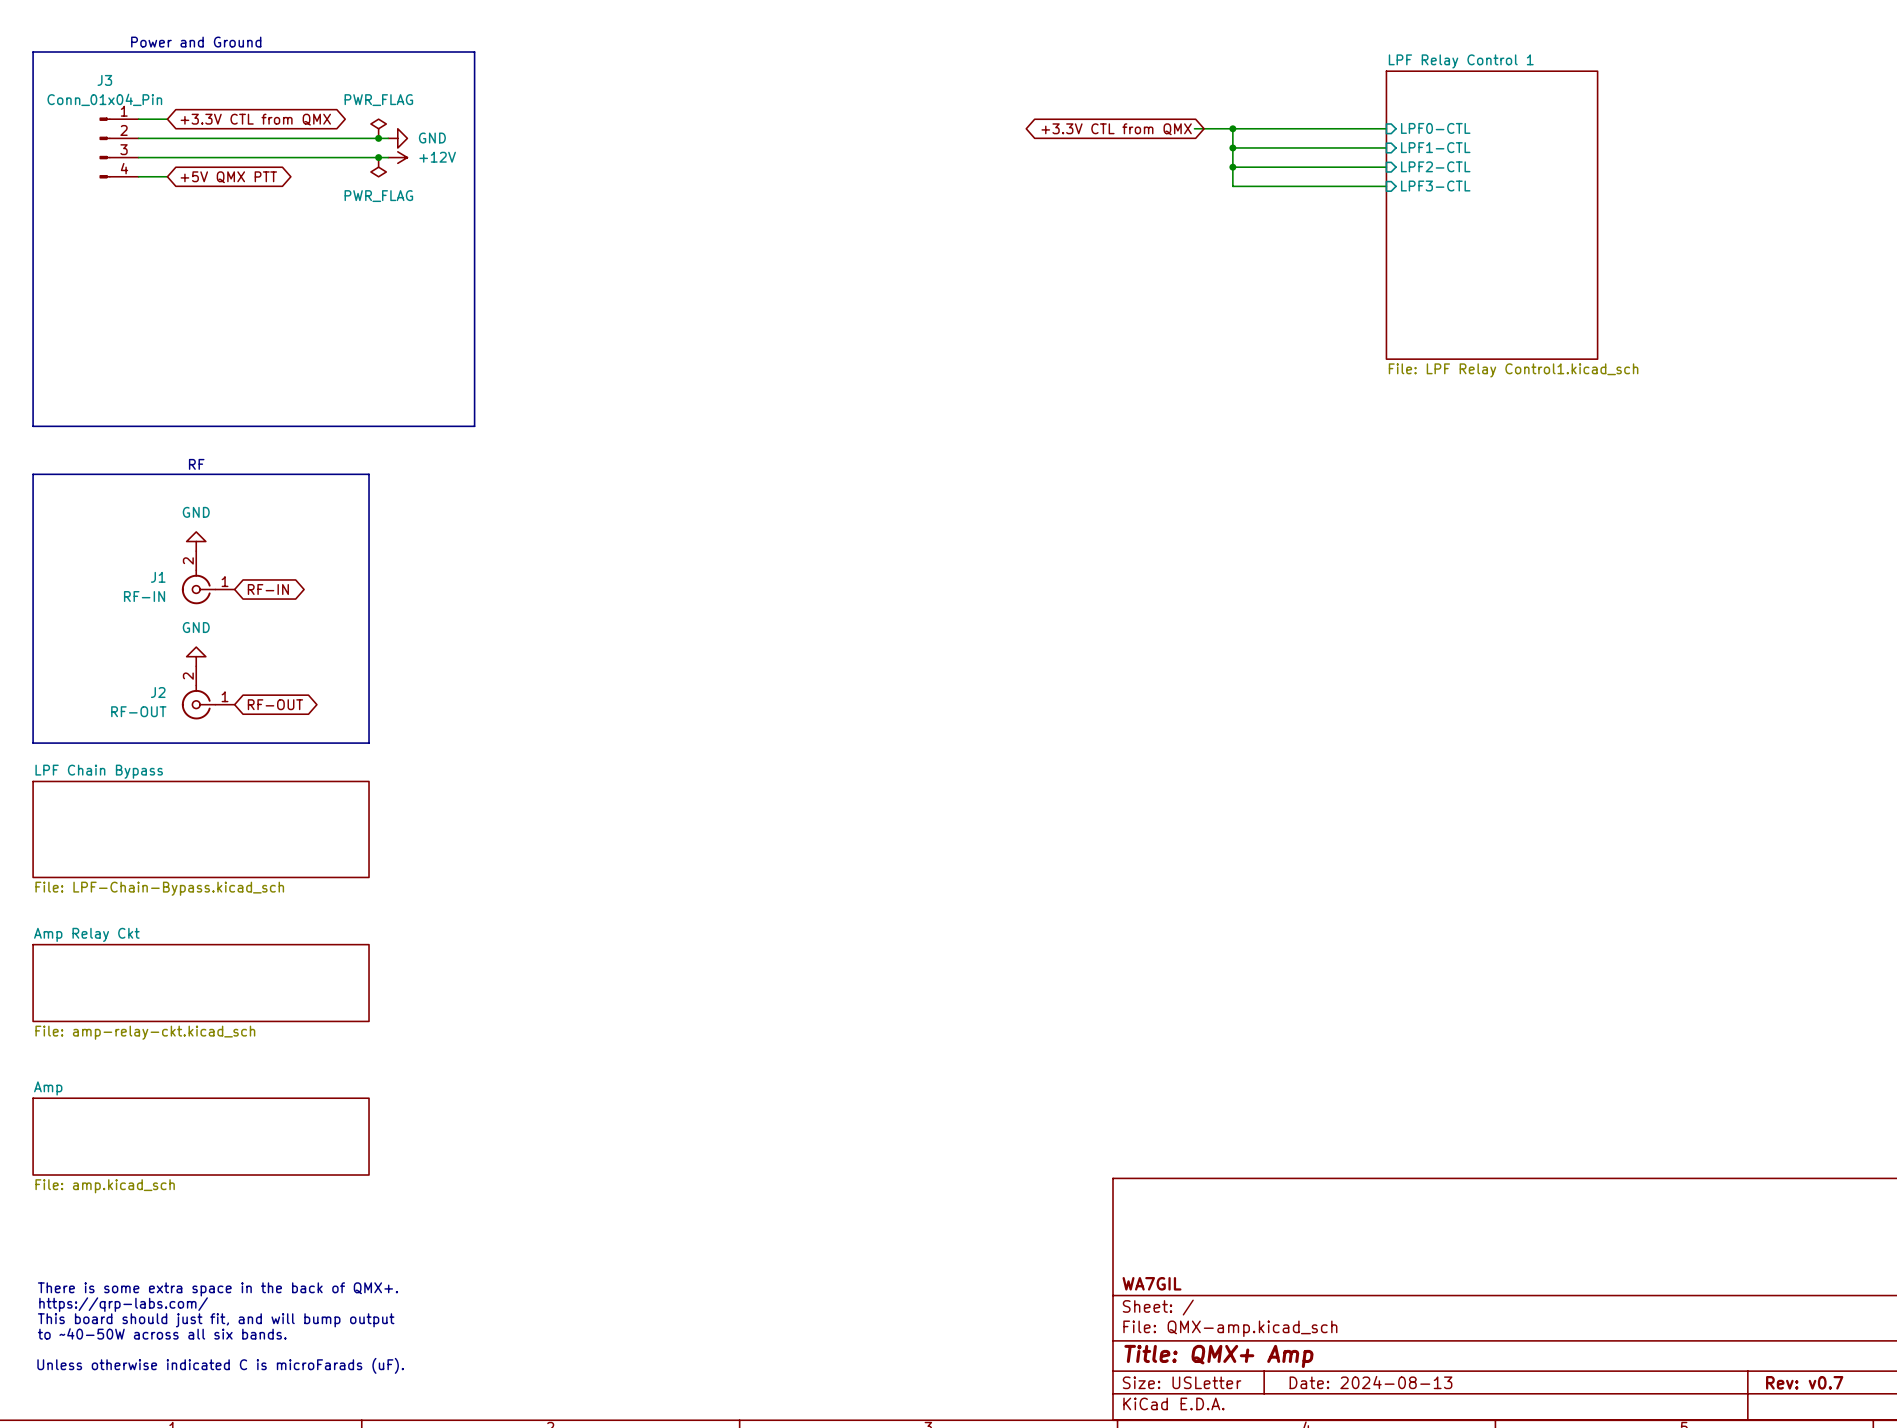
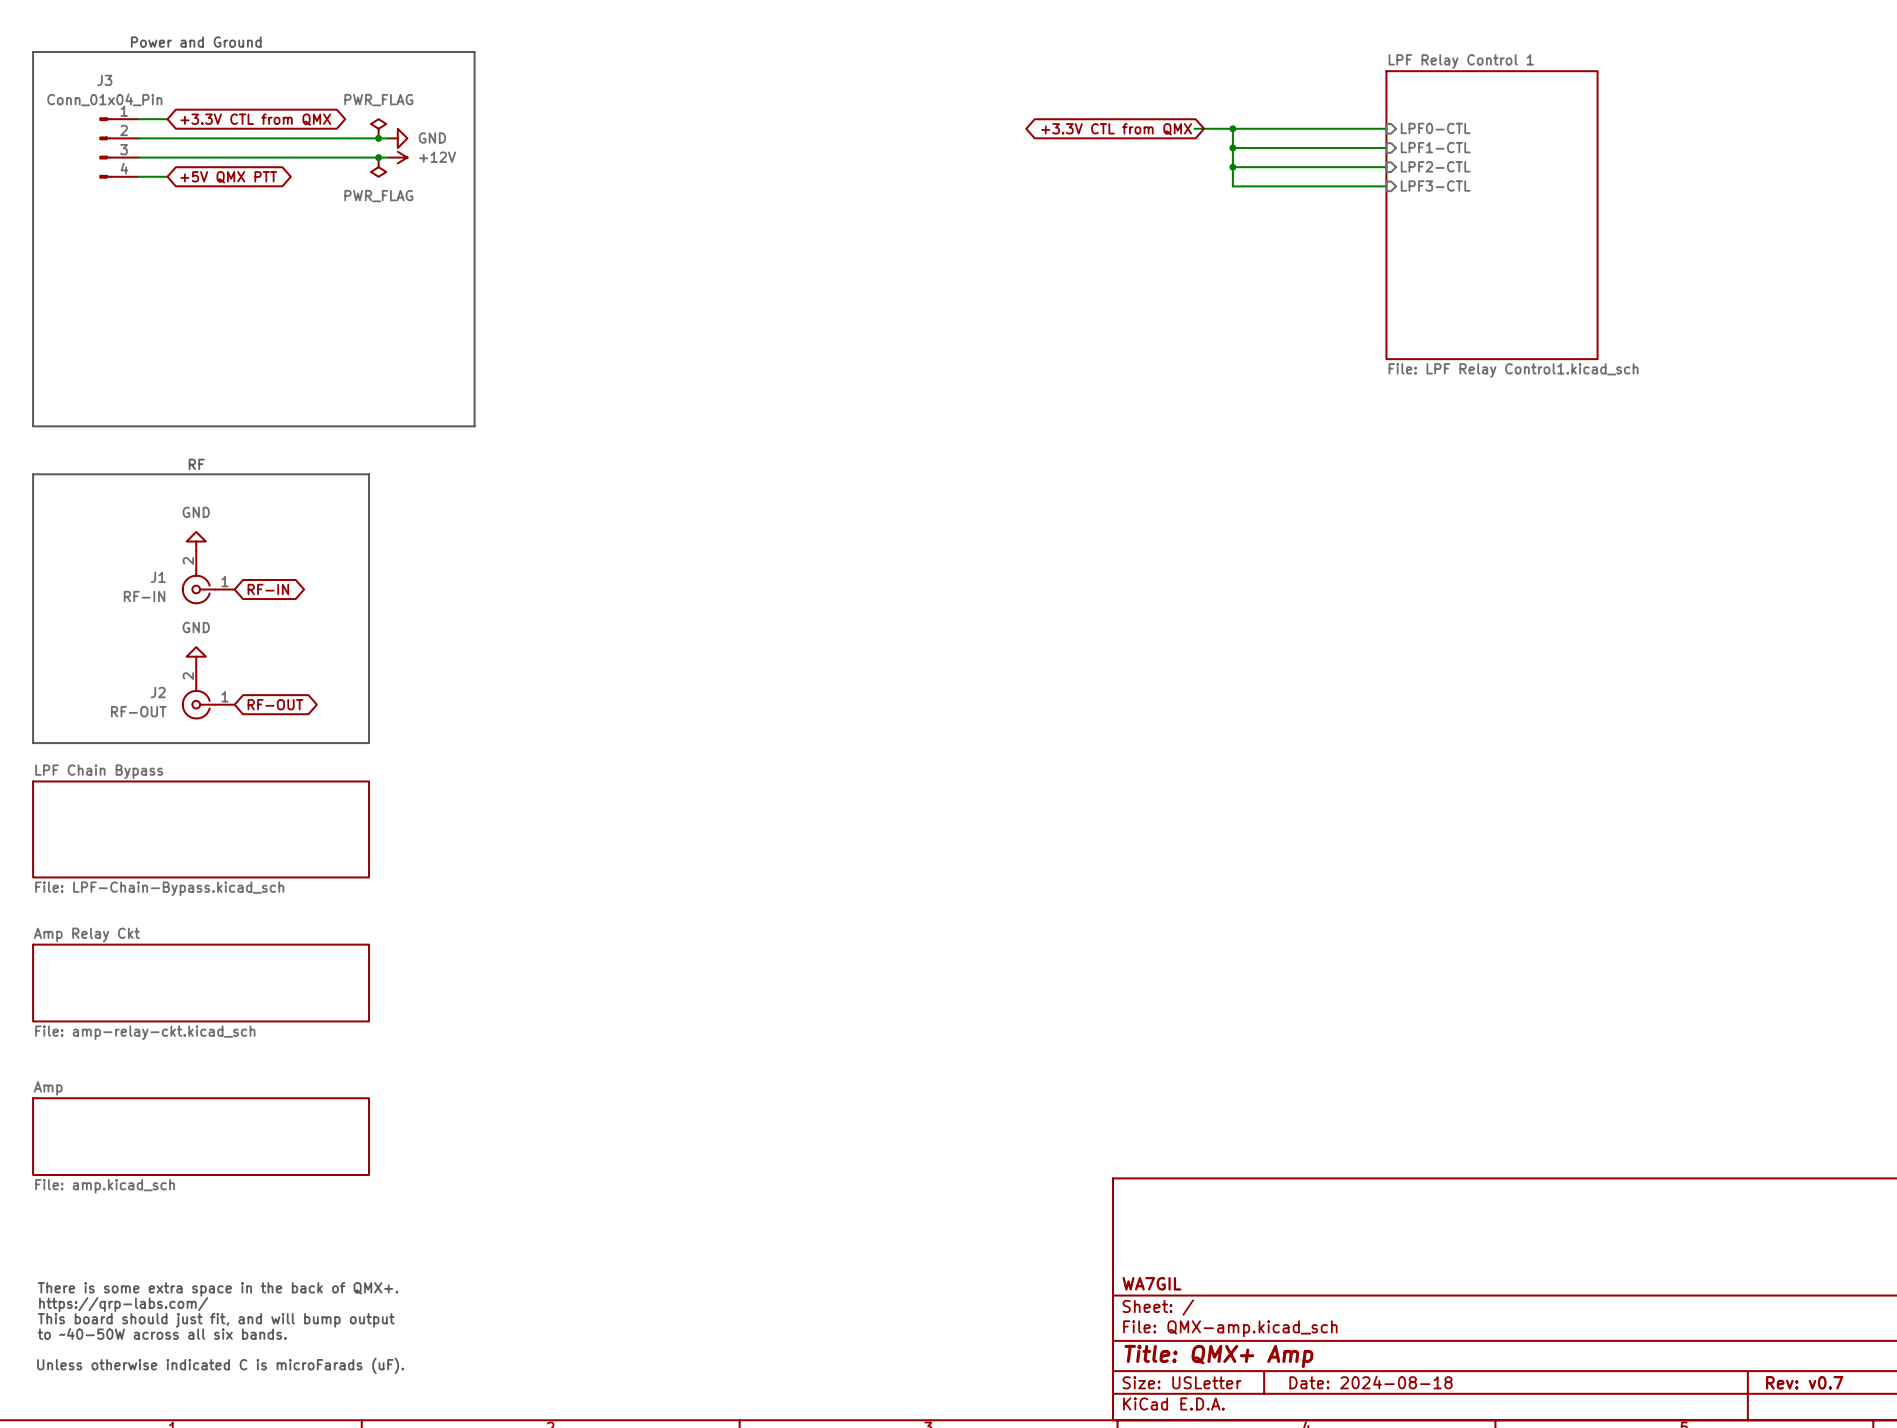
title block: Date: 2024-08-13 (1370, 1382) -> Date: 2024-08-18 (1370, 1382)

